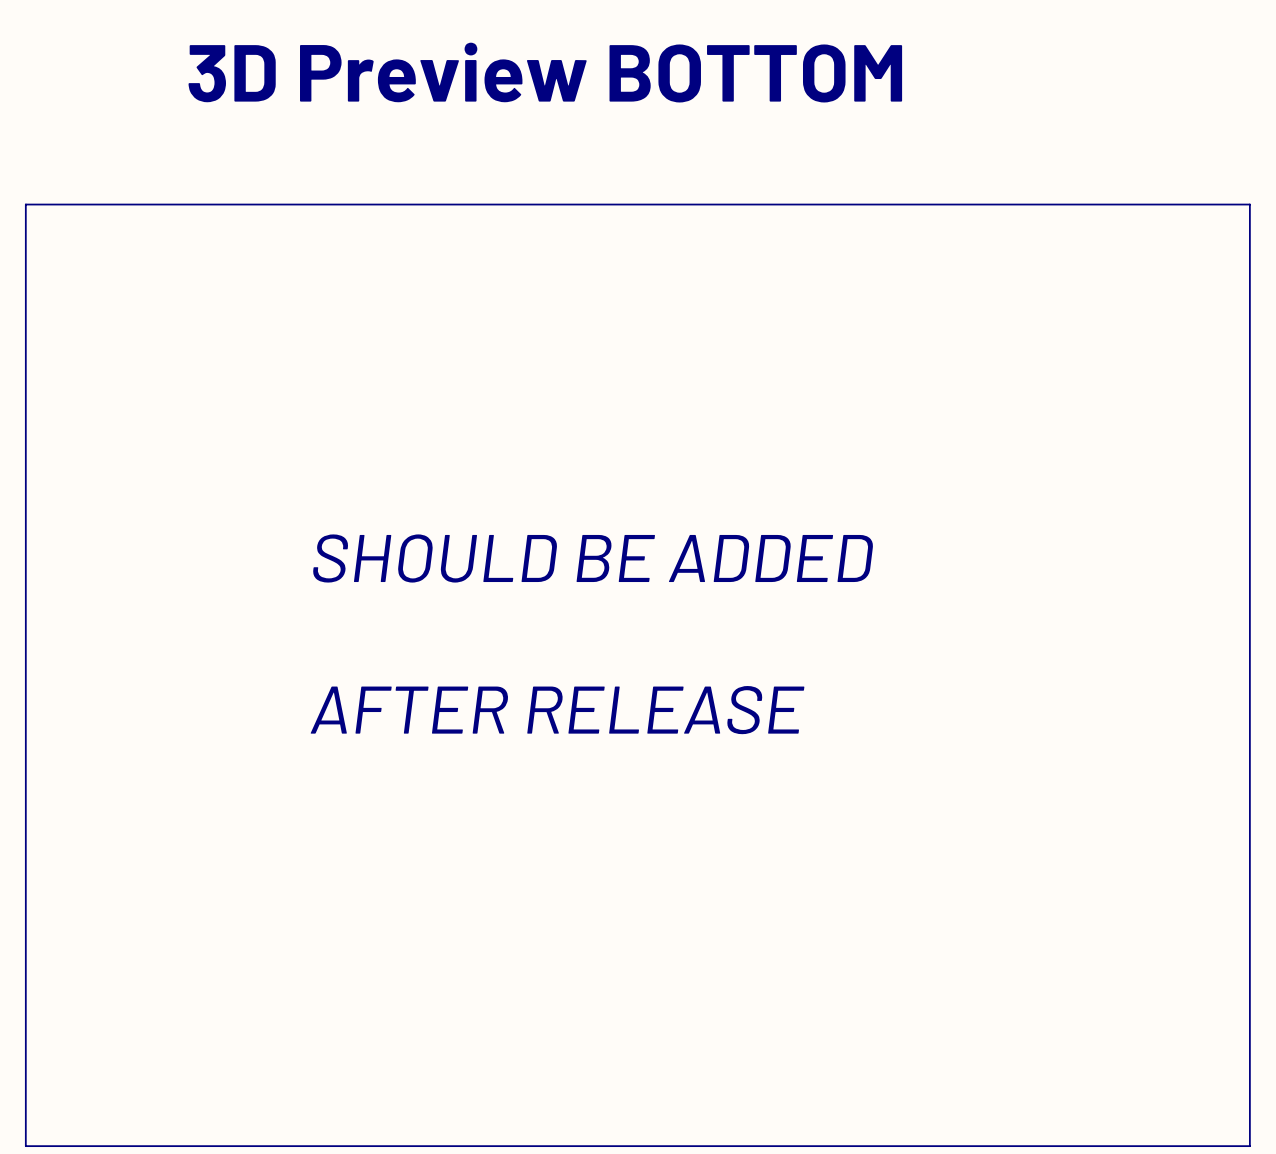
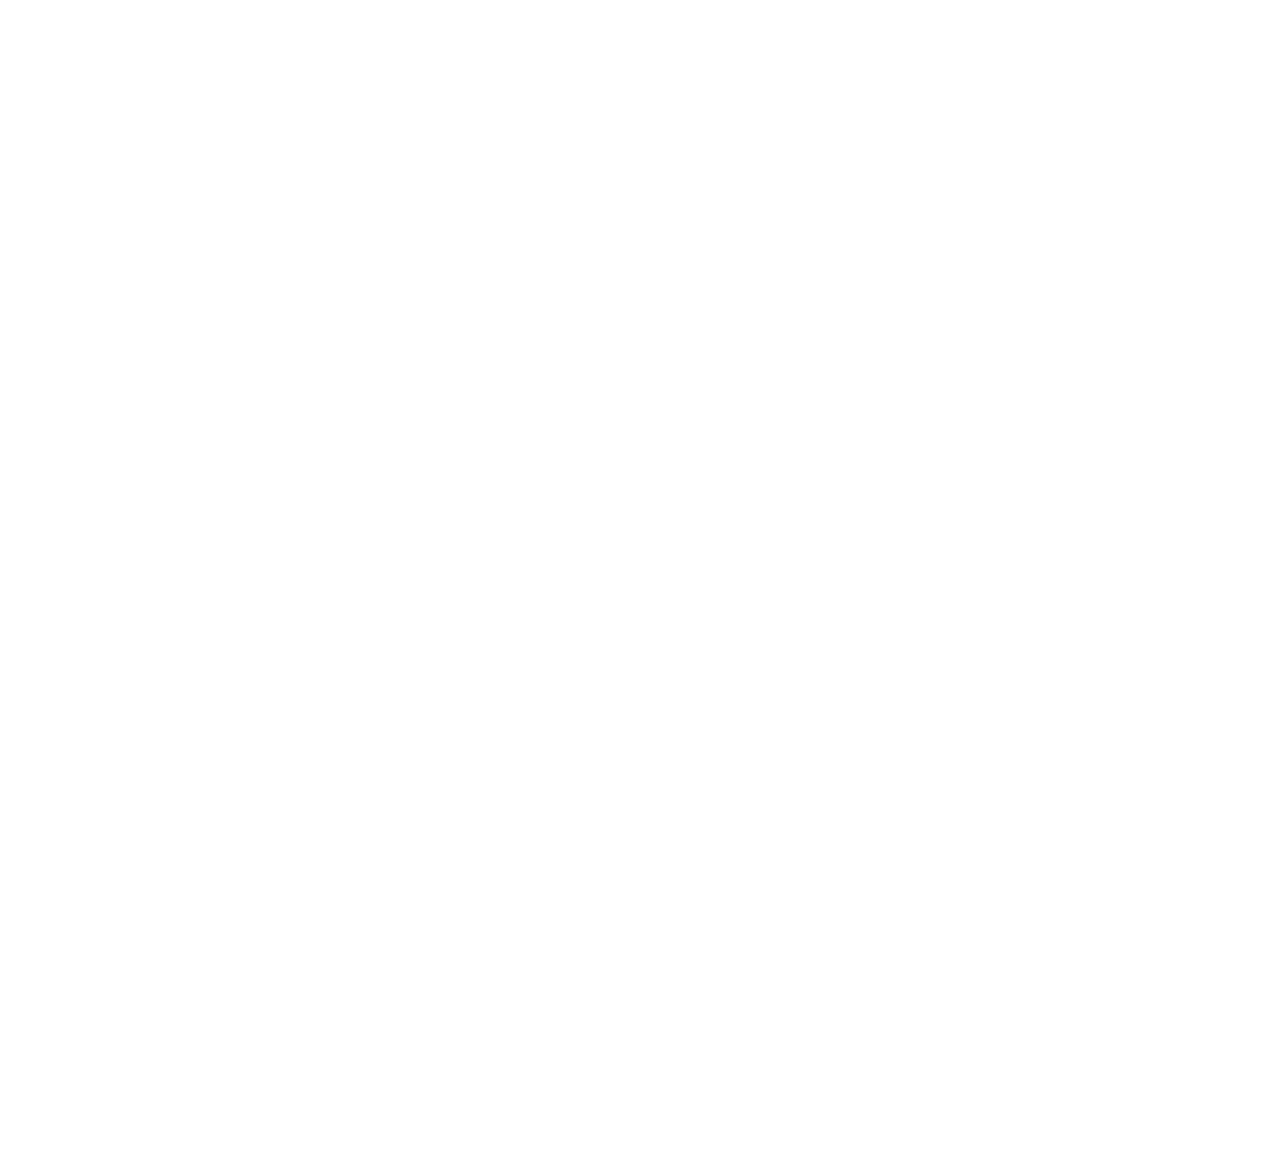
text: 3D Preview BOTTOM (545, 72) -> none
line: (25, 204) (1249, 204) (1249, 1146) (25, 1146) (25, 204) -> none
text: SHOULD BE ADDED (593, 558) -> none
text: AFTER RELEASE (557, 710) -> none

